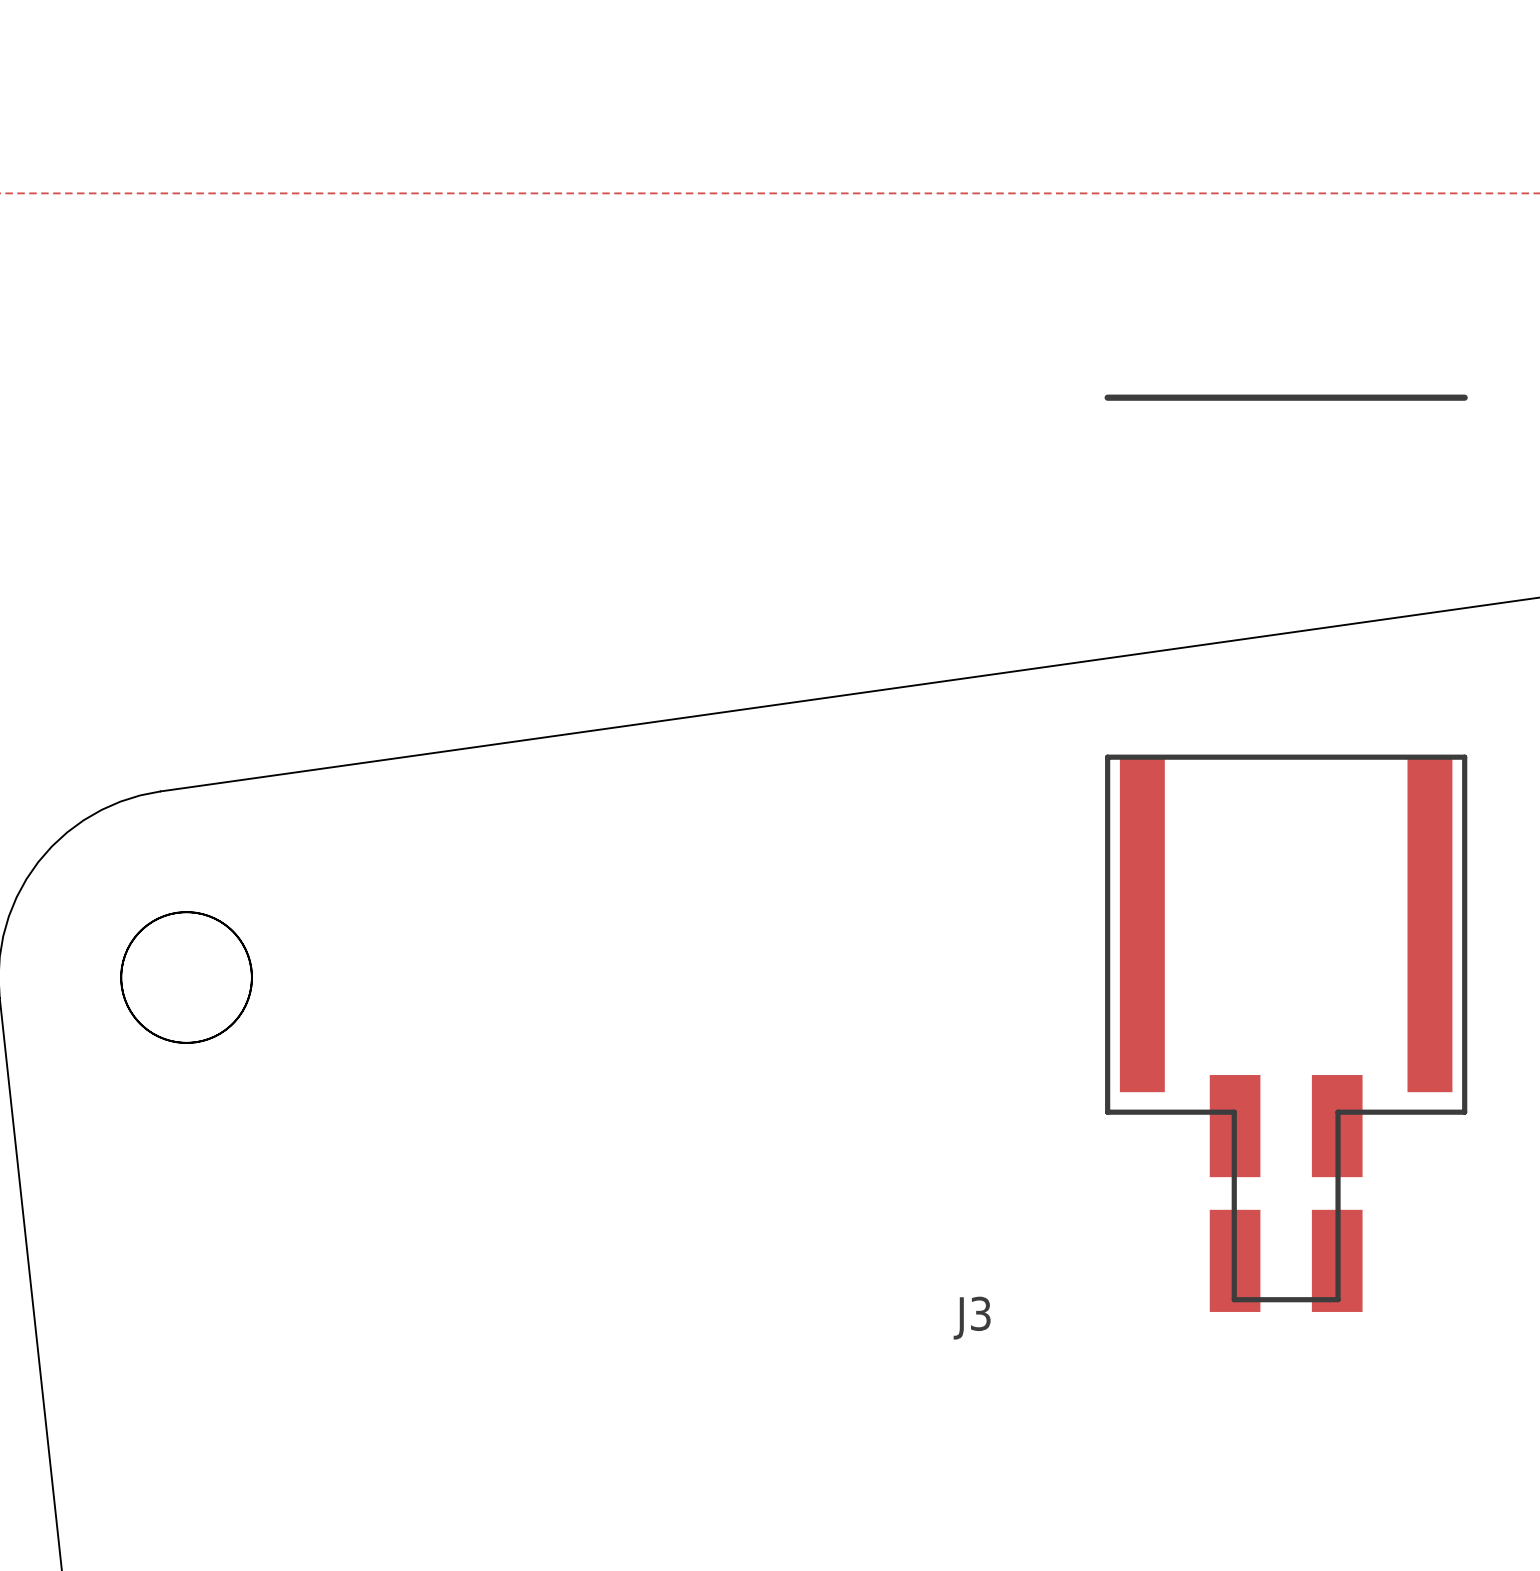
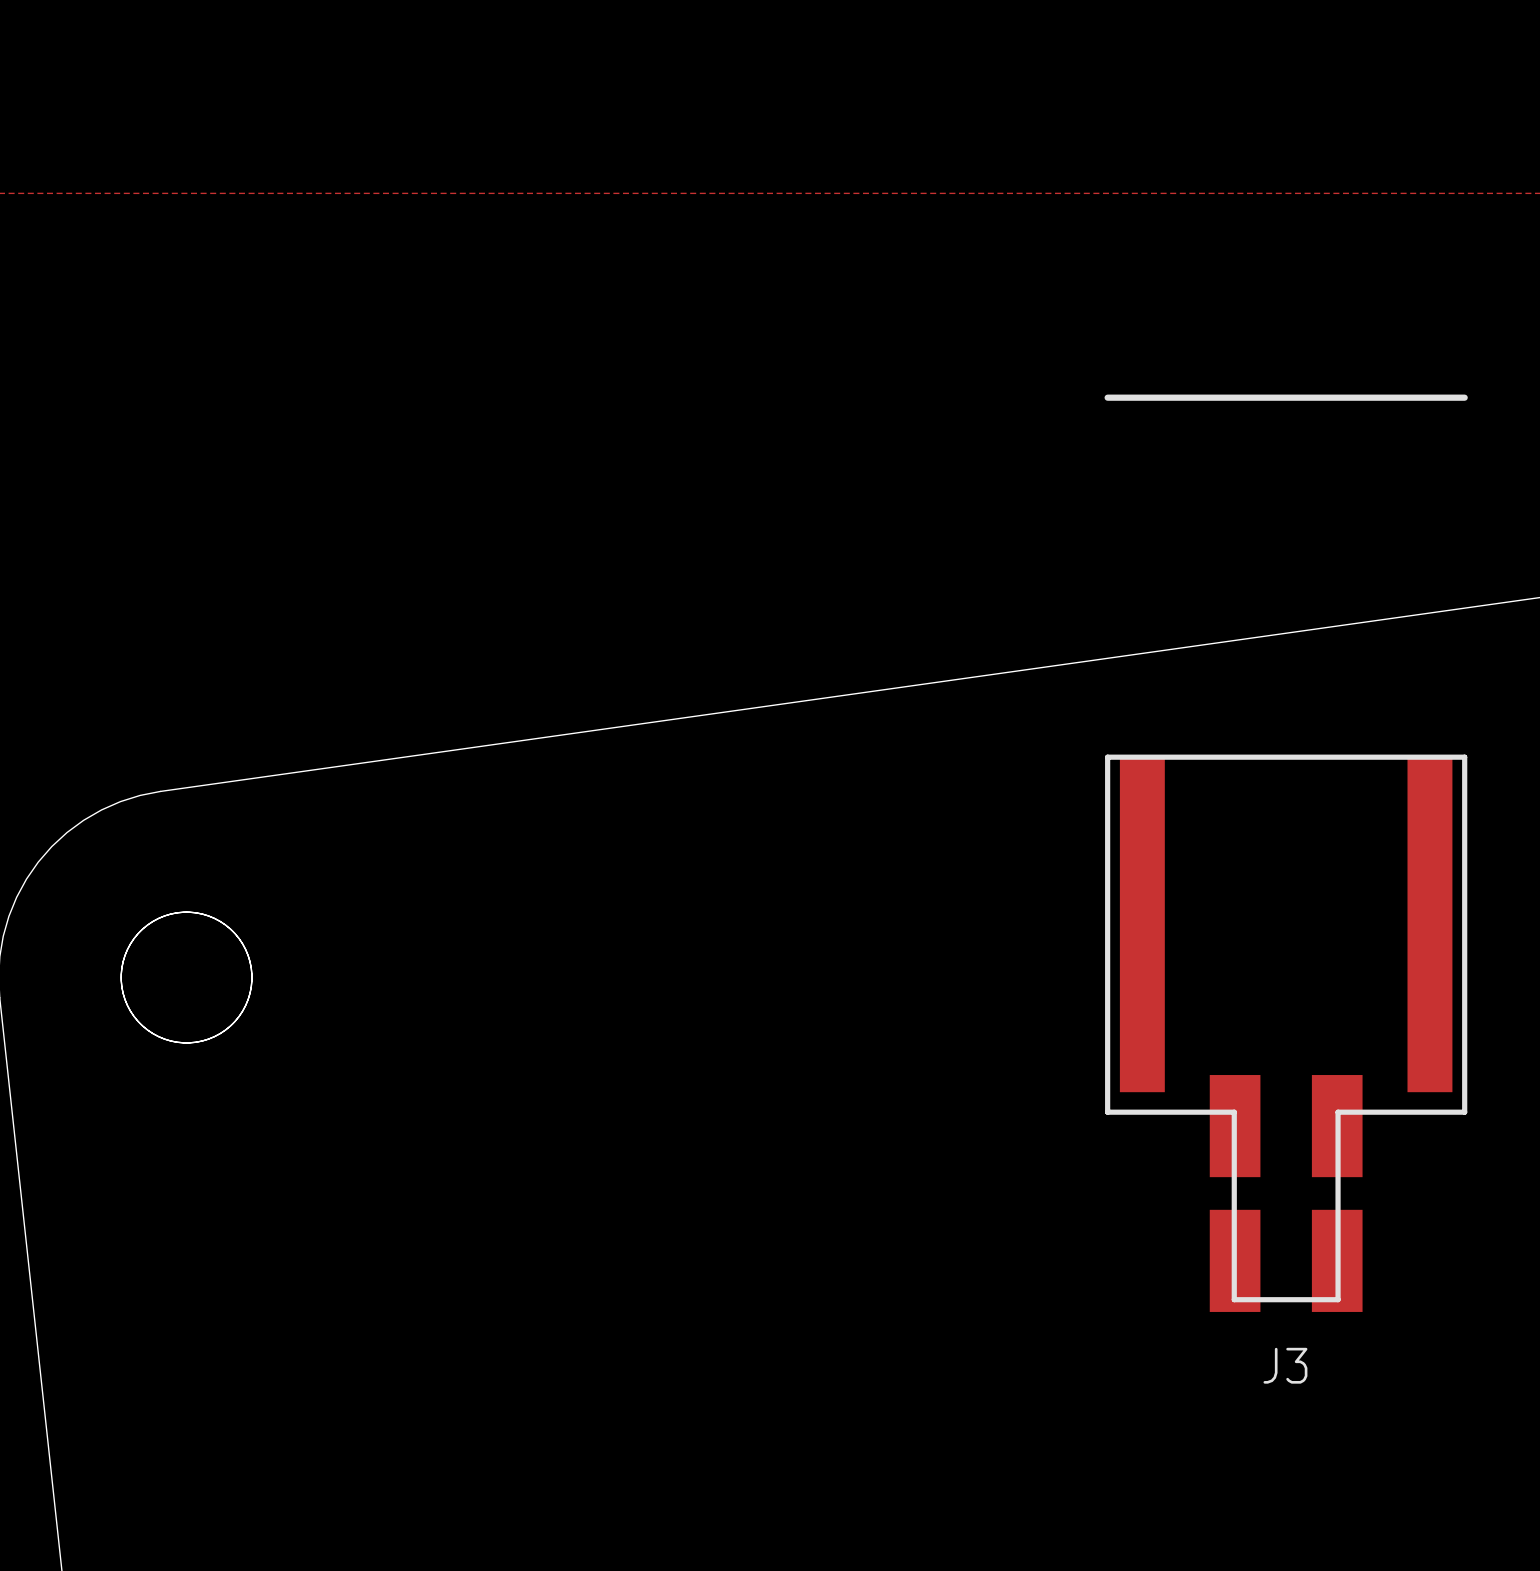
J3 name position: J3 (972, 1318) -> J3 (1285, 1365)

